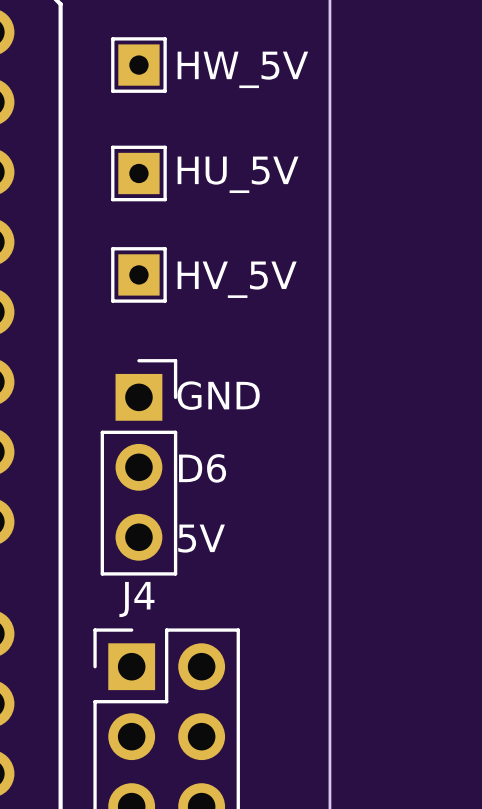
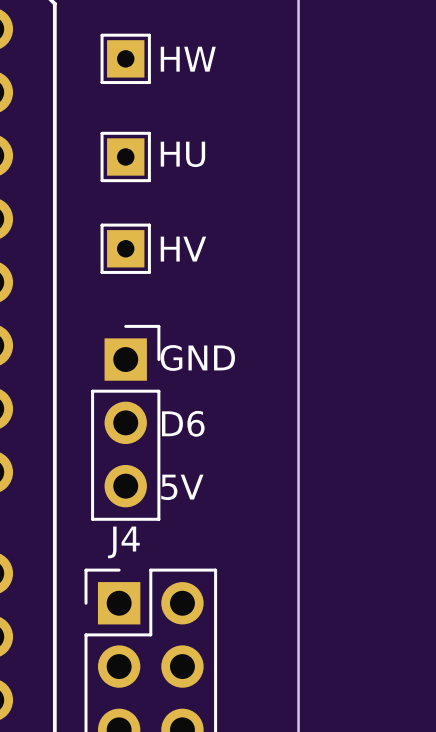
text: HW_5V (242, 69) -> HW (188, 59)
text: HU_5V (238, 174) -> HU (182, 154)
text: HV_5V (237, 279) -> HV (183, 249)

